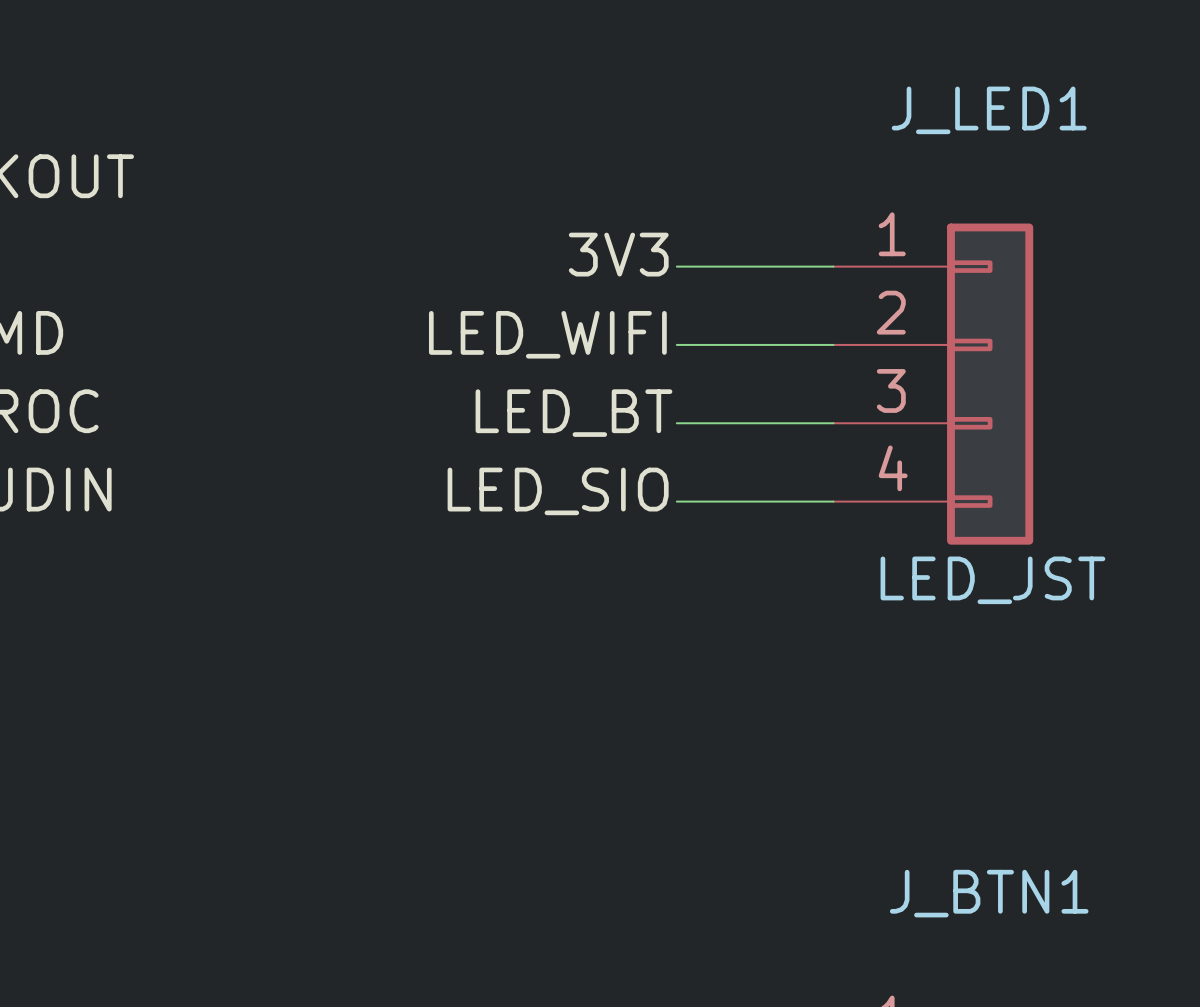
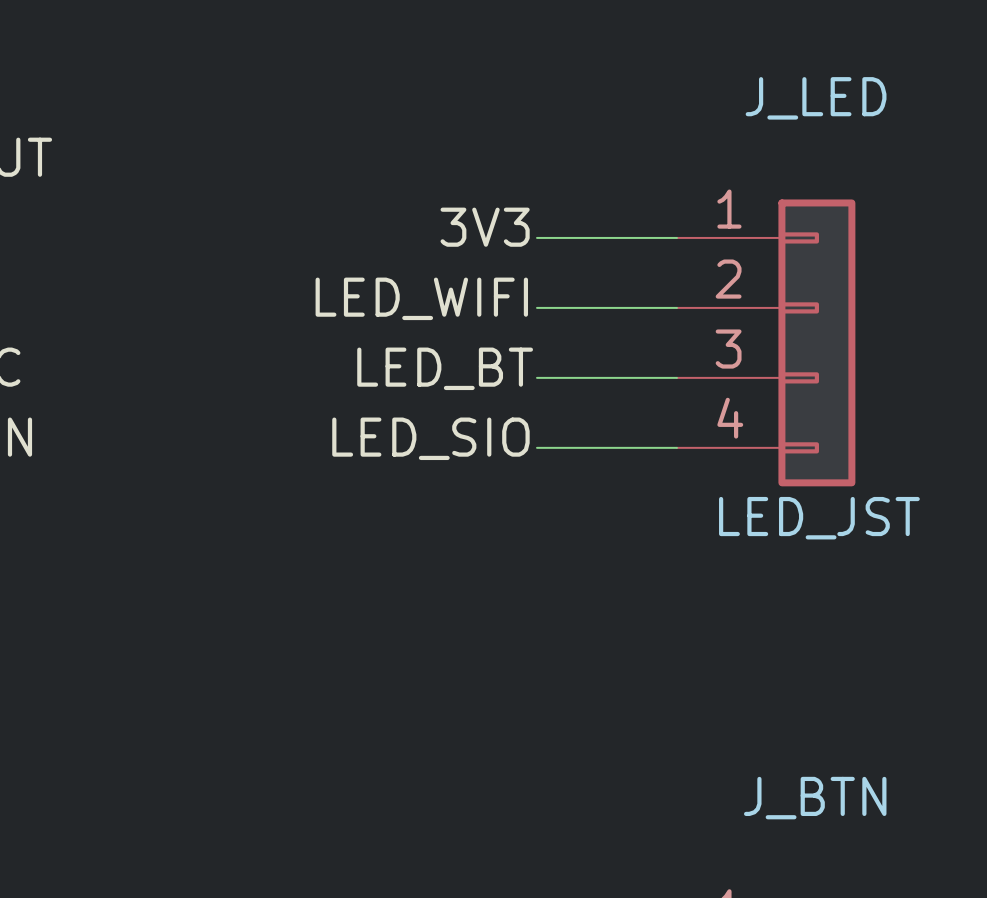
J_LED1 name: J_LED1 (989, 110) -> J_LED (816, 98)
J_BTN1 name: J_BTN1 (989, 893) -> J_BTN (815, 798)

